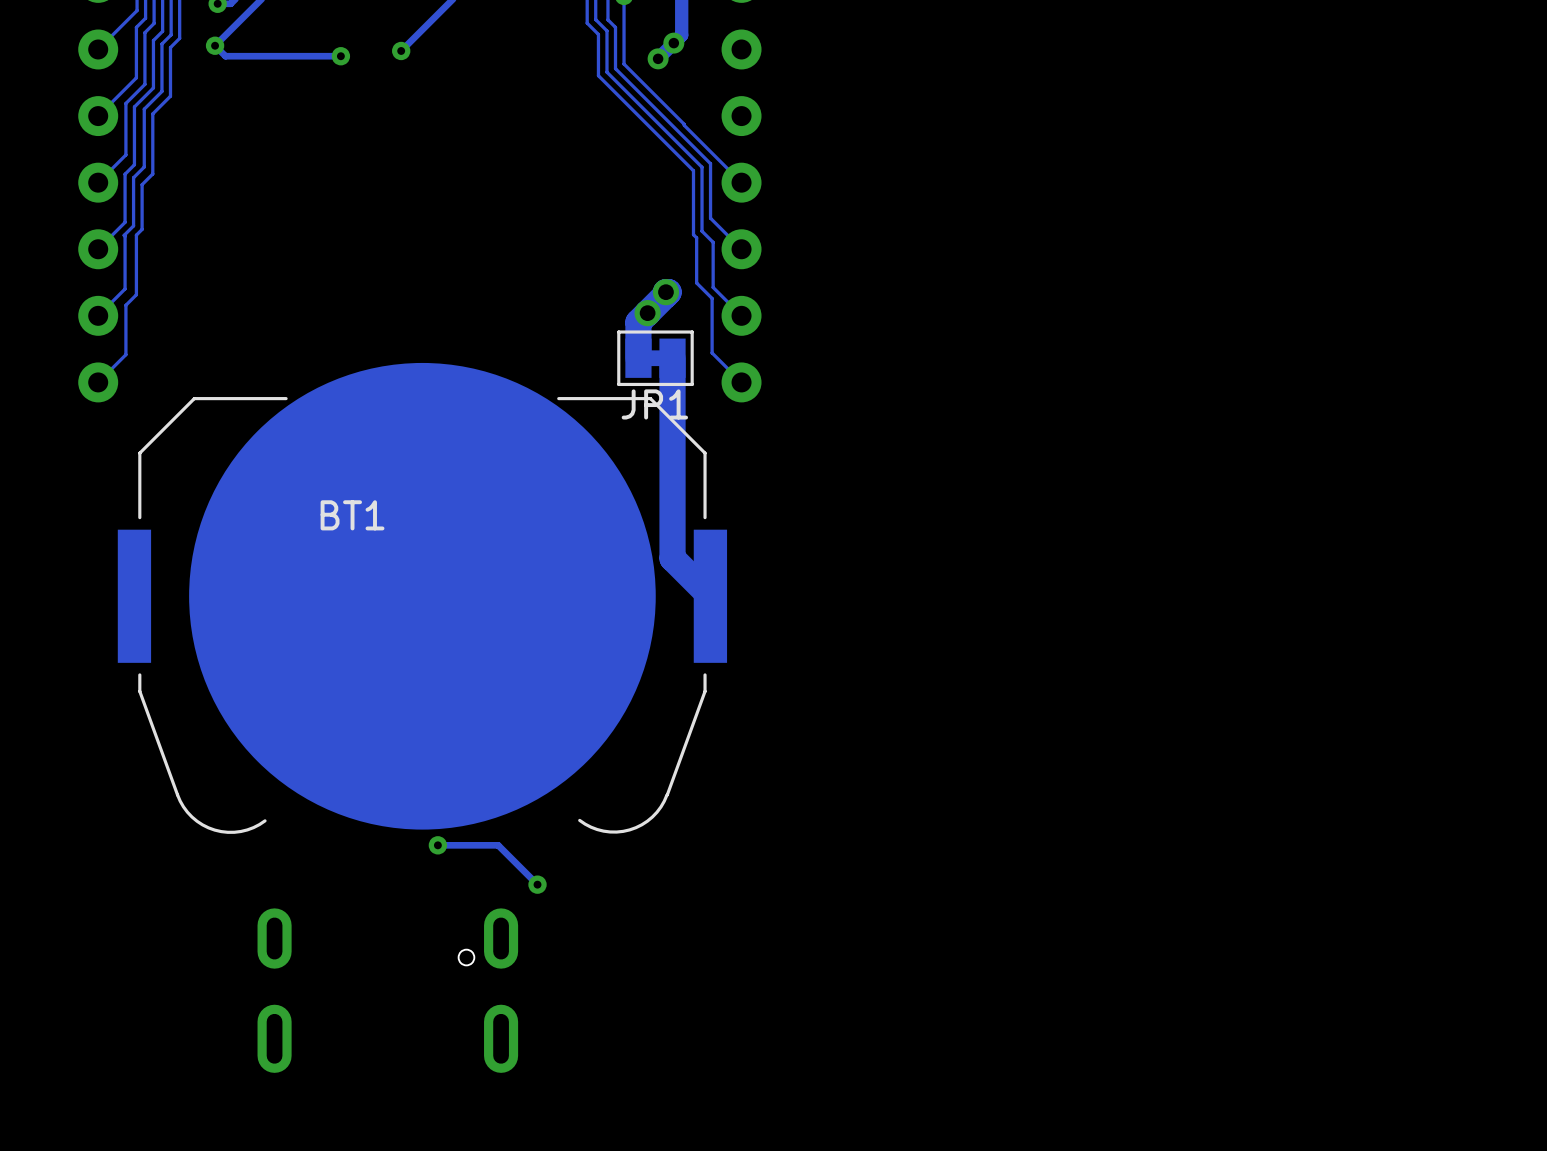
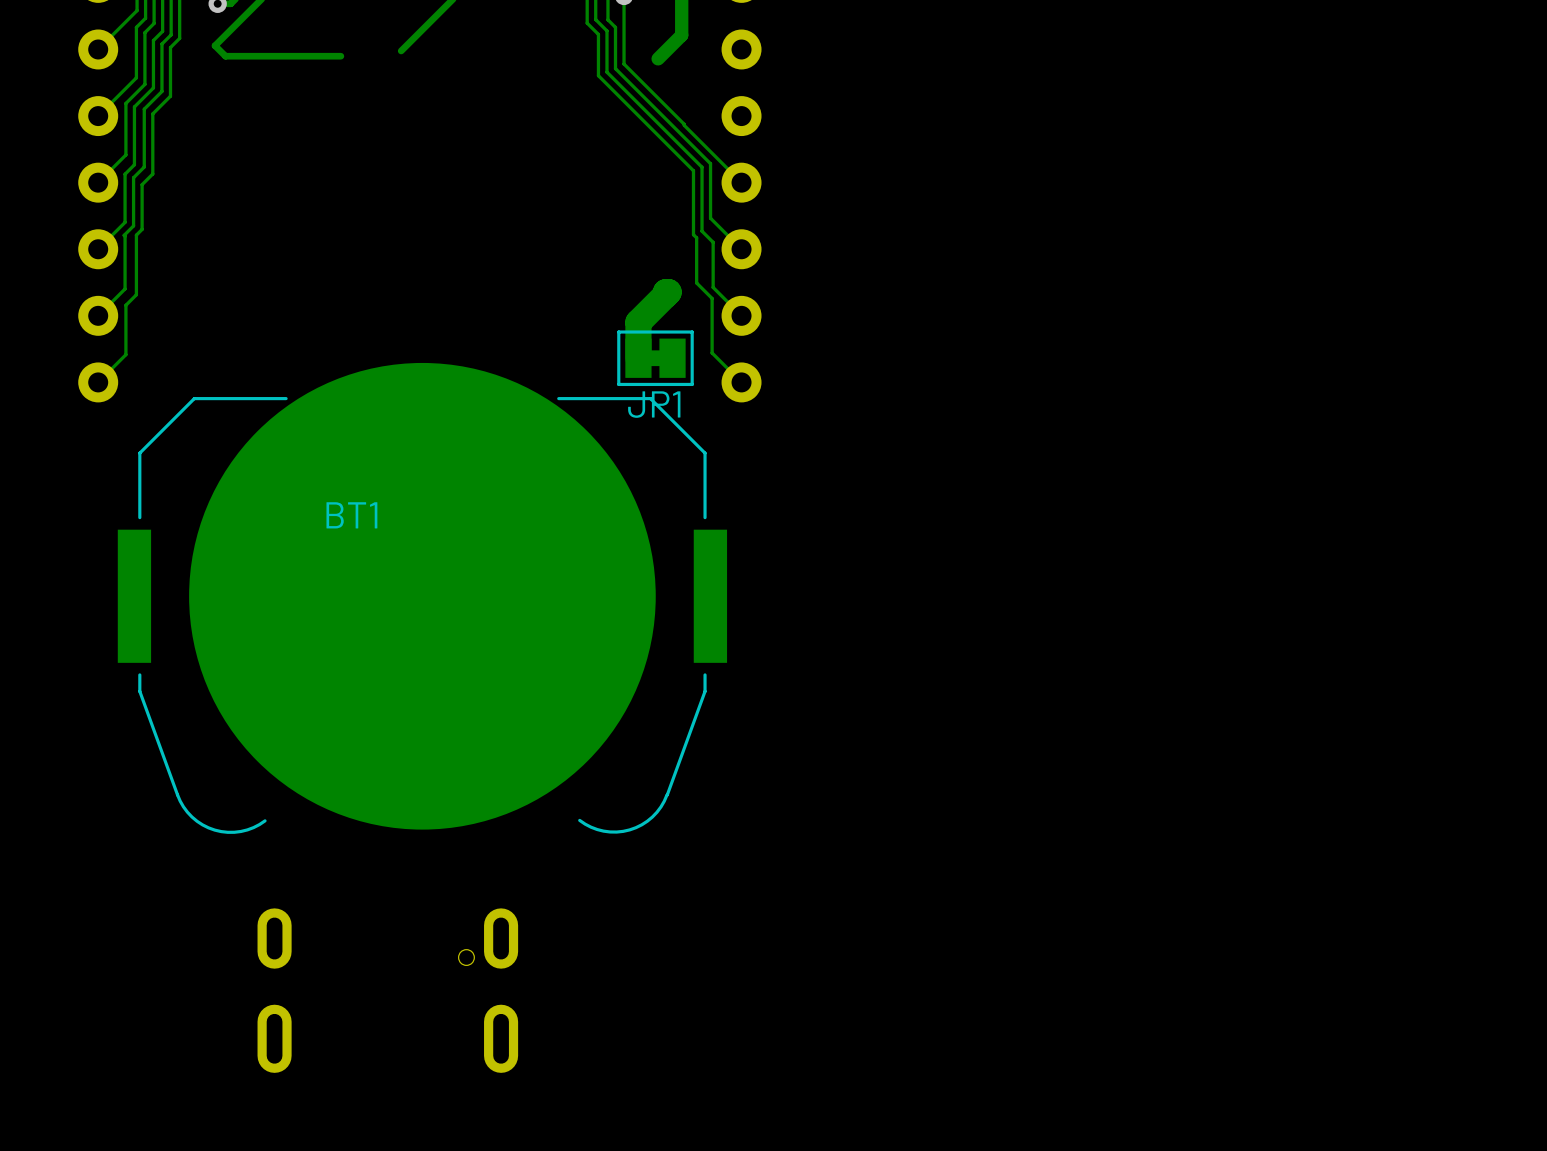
via: (673, 43) -> none
via: (215, 45) -> none
via: (401, 50) -> none
via: (340, 56) -> none
via: (658, 58) -> none
via: (665, 292) -> none
via: (647, 313) -> none
track: (672, 358) (672, 558) (710, 596) -> none
track: (437, 845) (498, 845) (537, 884) -> none
via: (437, 845) -> none
via: (537, 884) -> none

